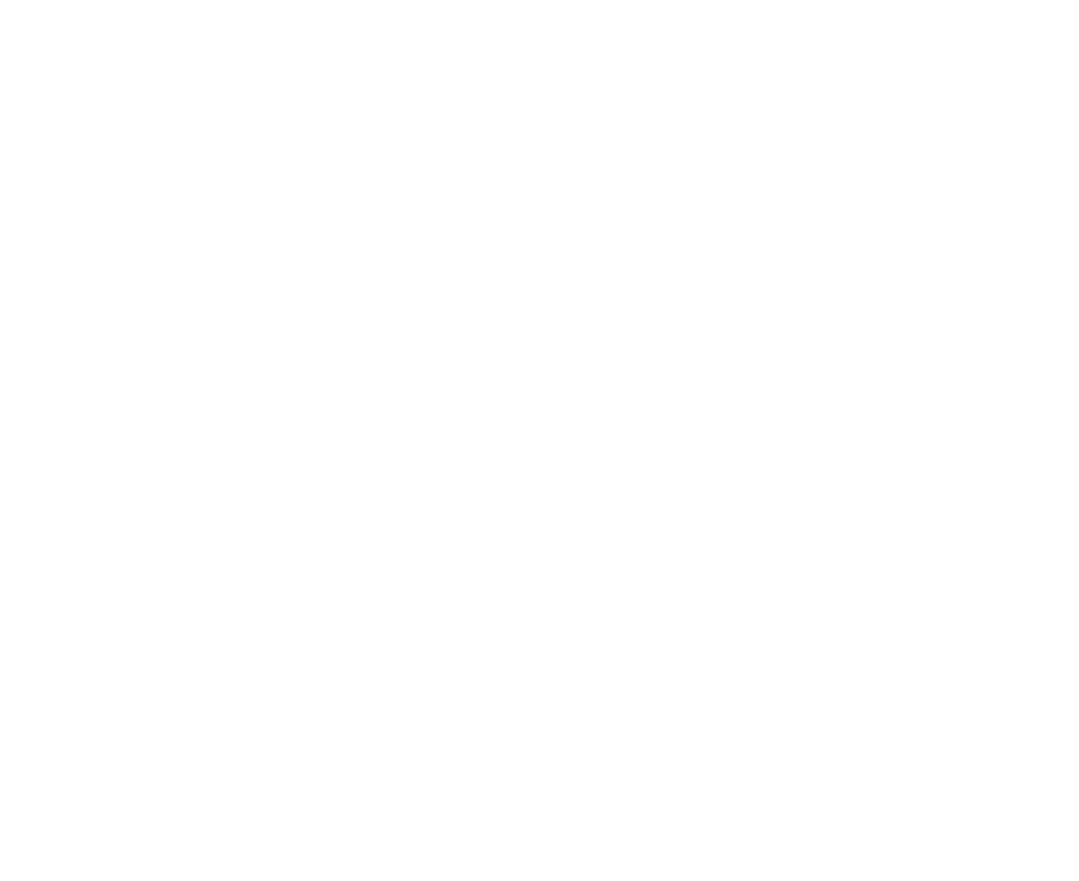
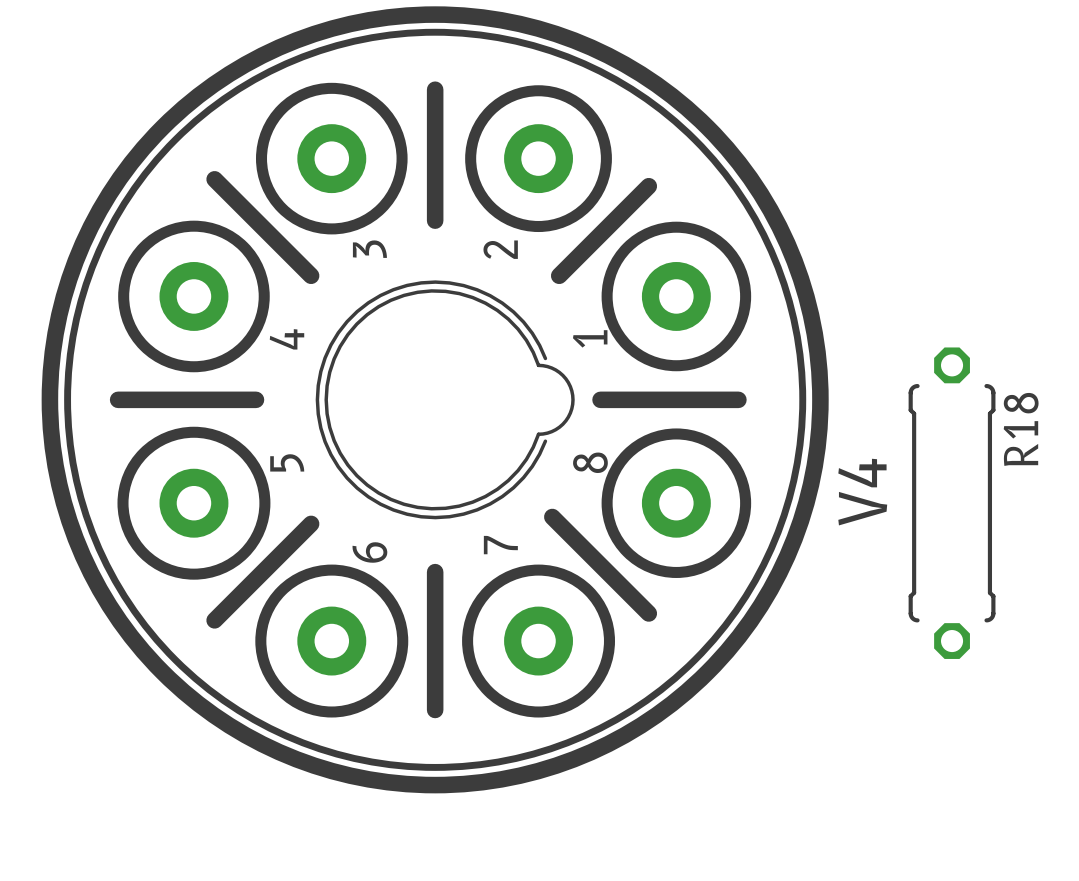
V4: none -> (435, 399)
R18: none -> (952, 503)

